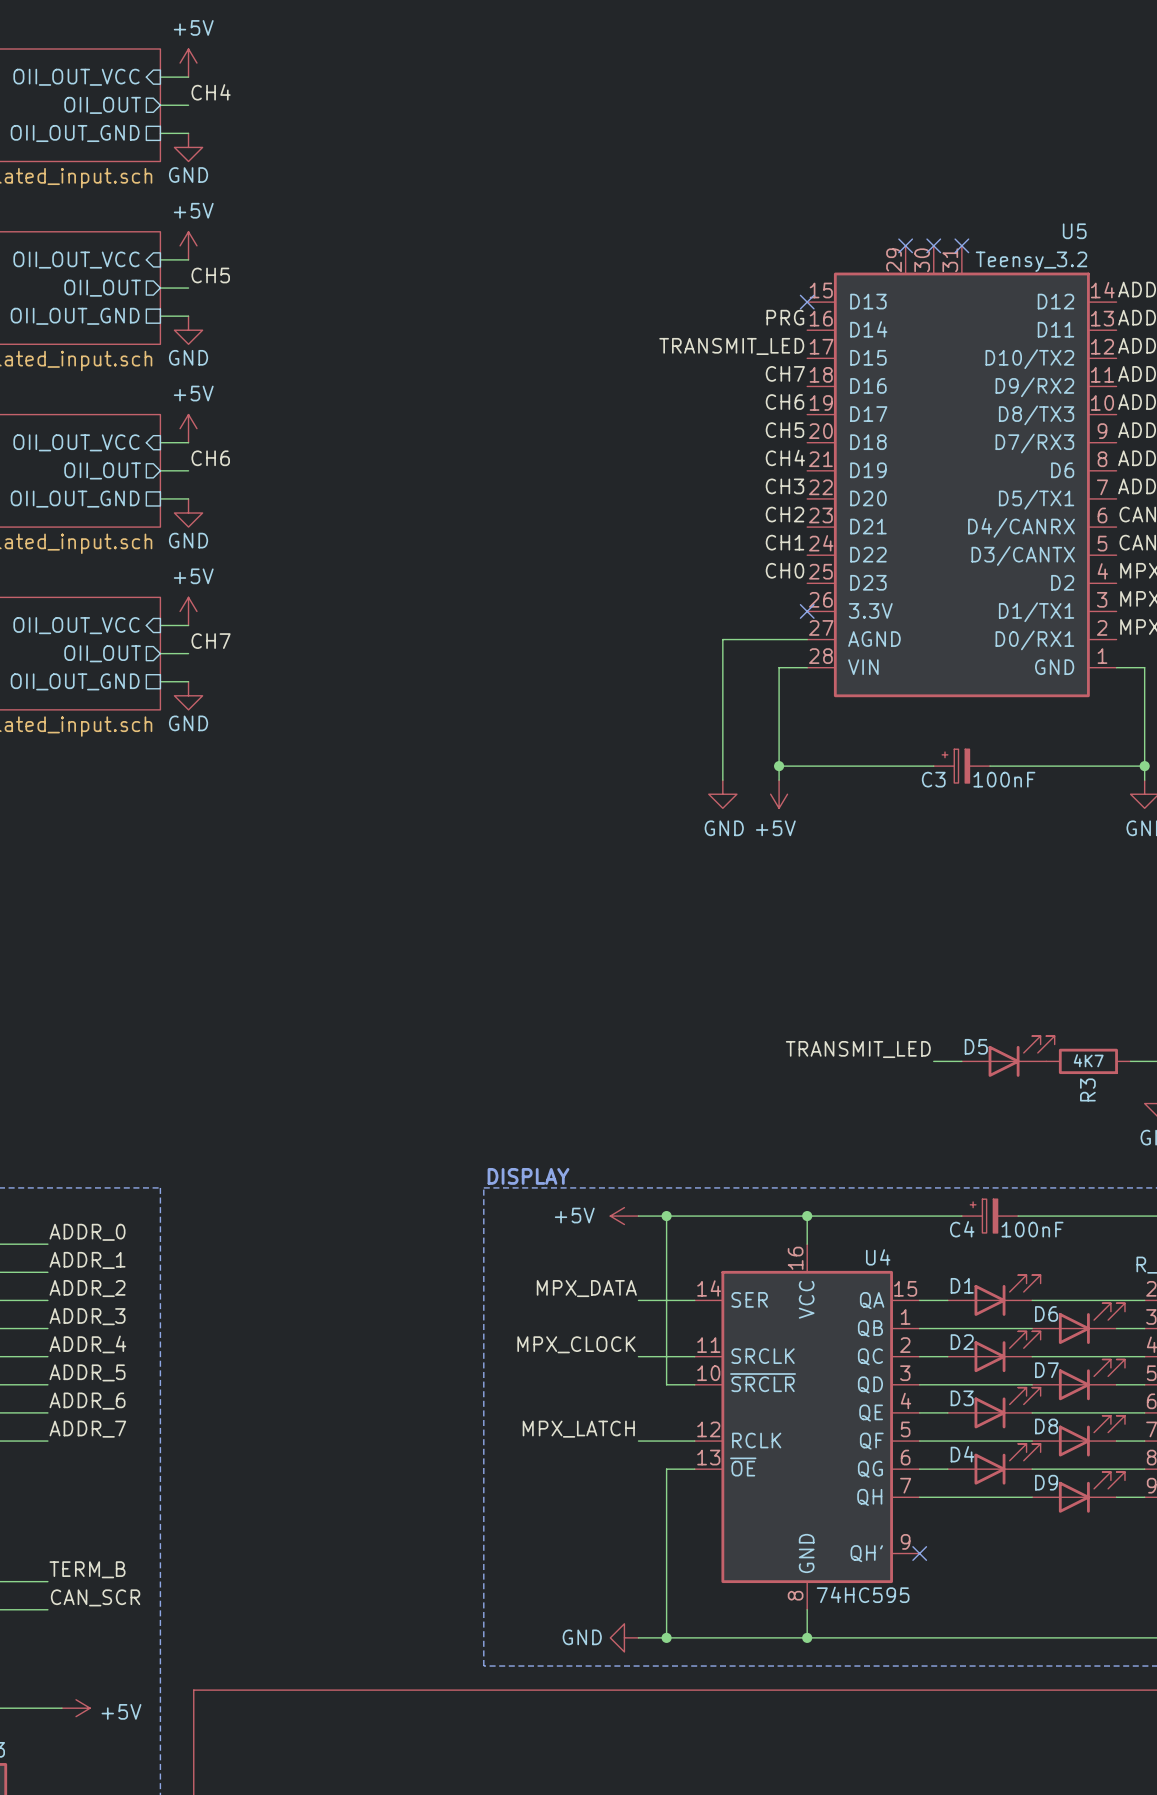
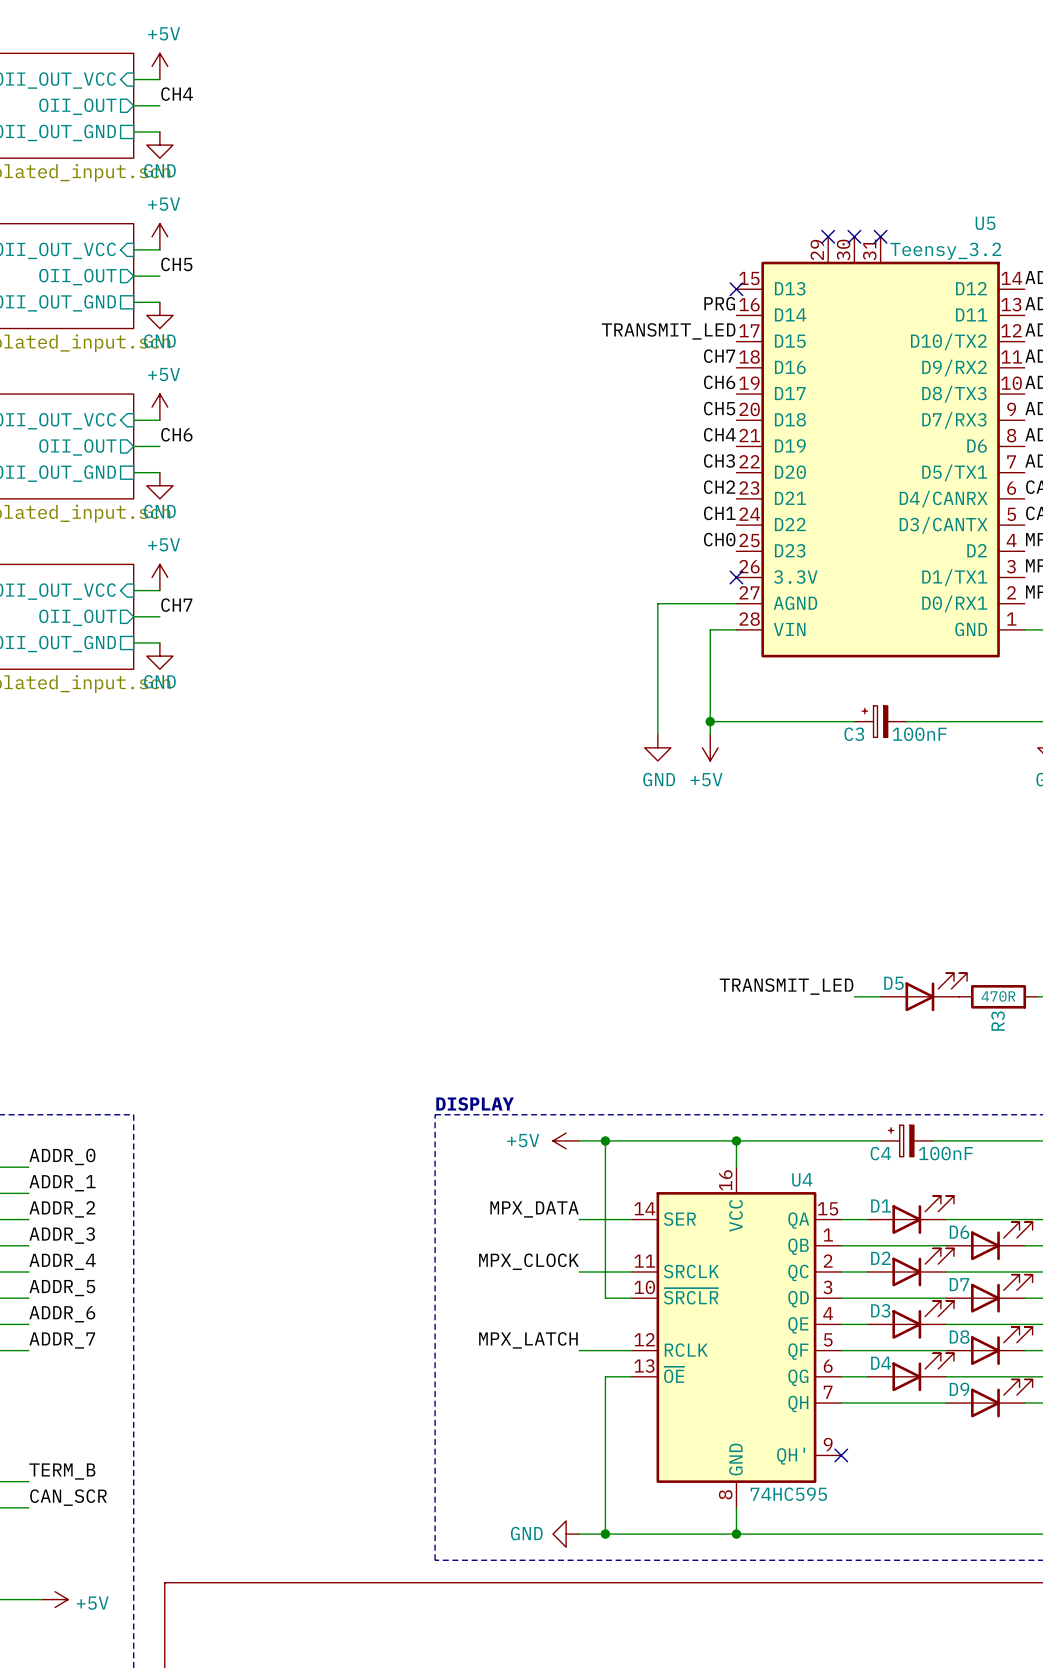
R3 value: 4K7 (1088, 1060) -> 470R (998, 996)

